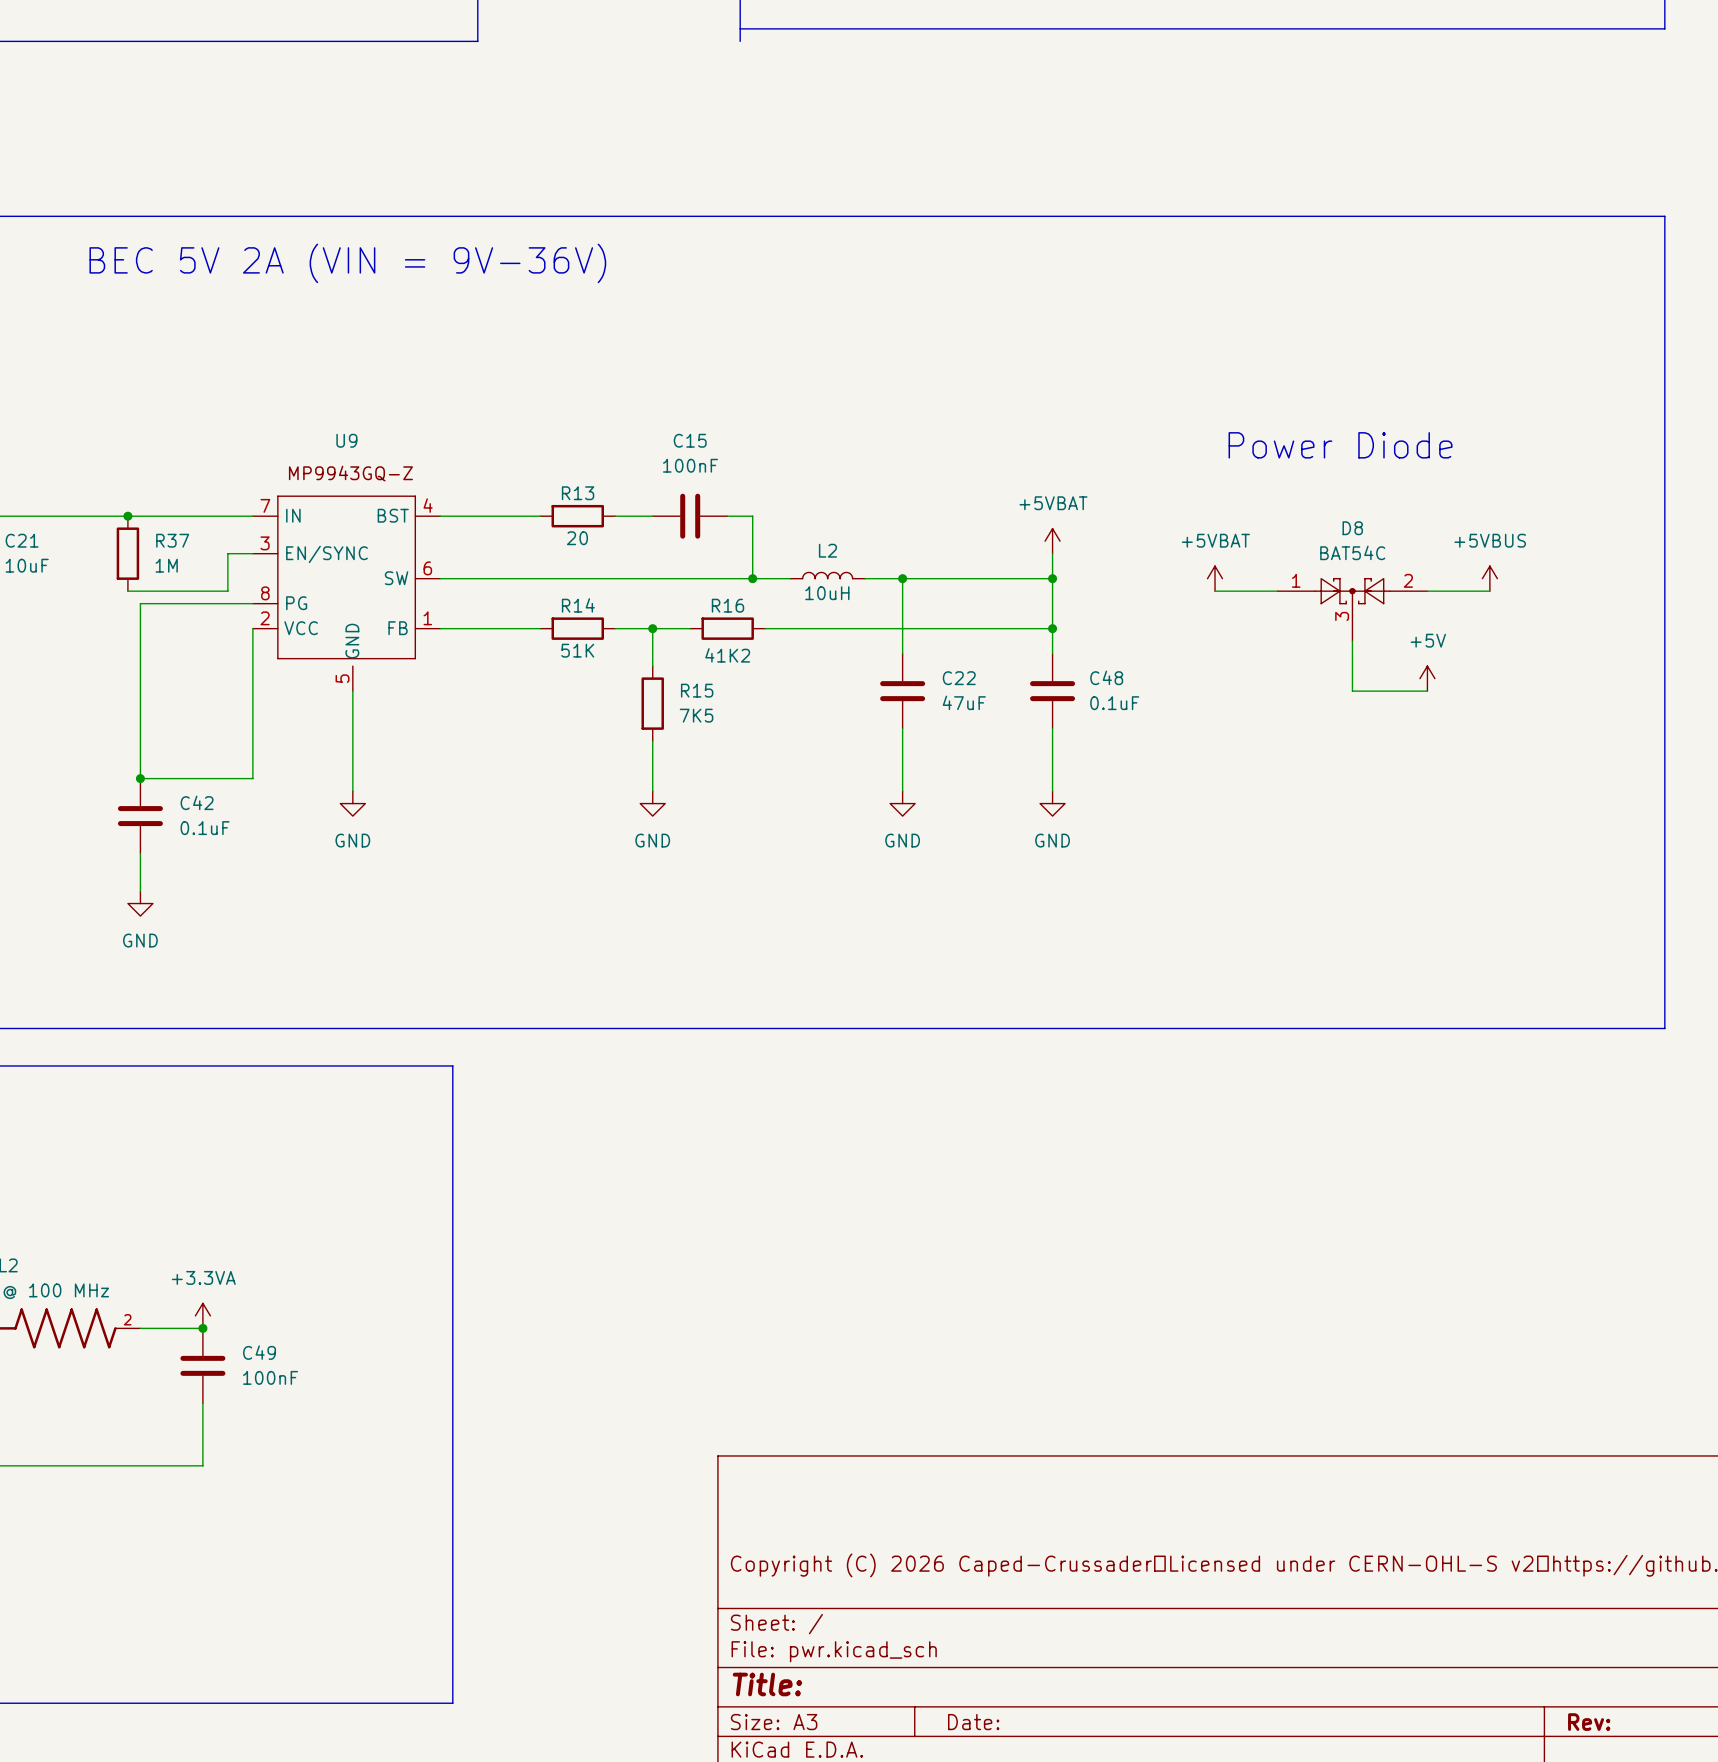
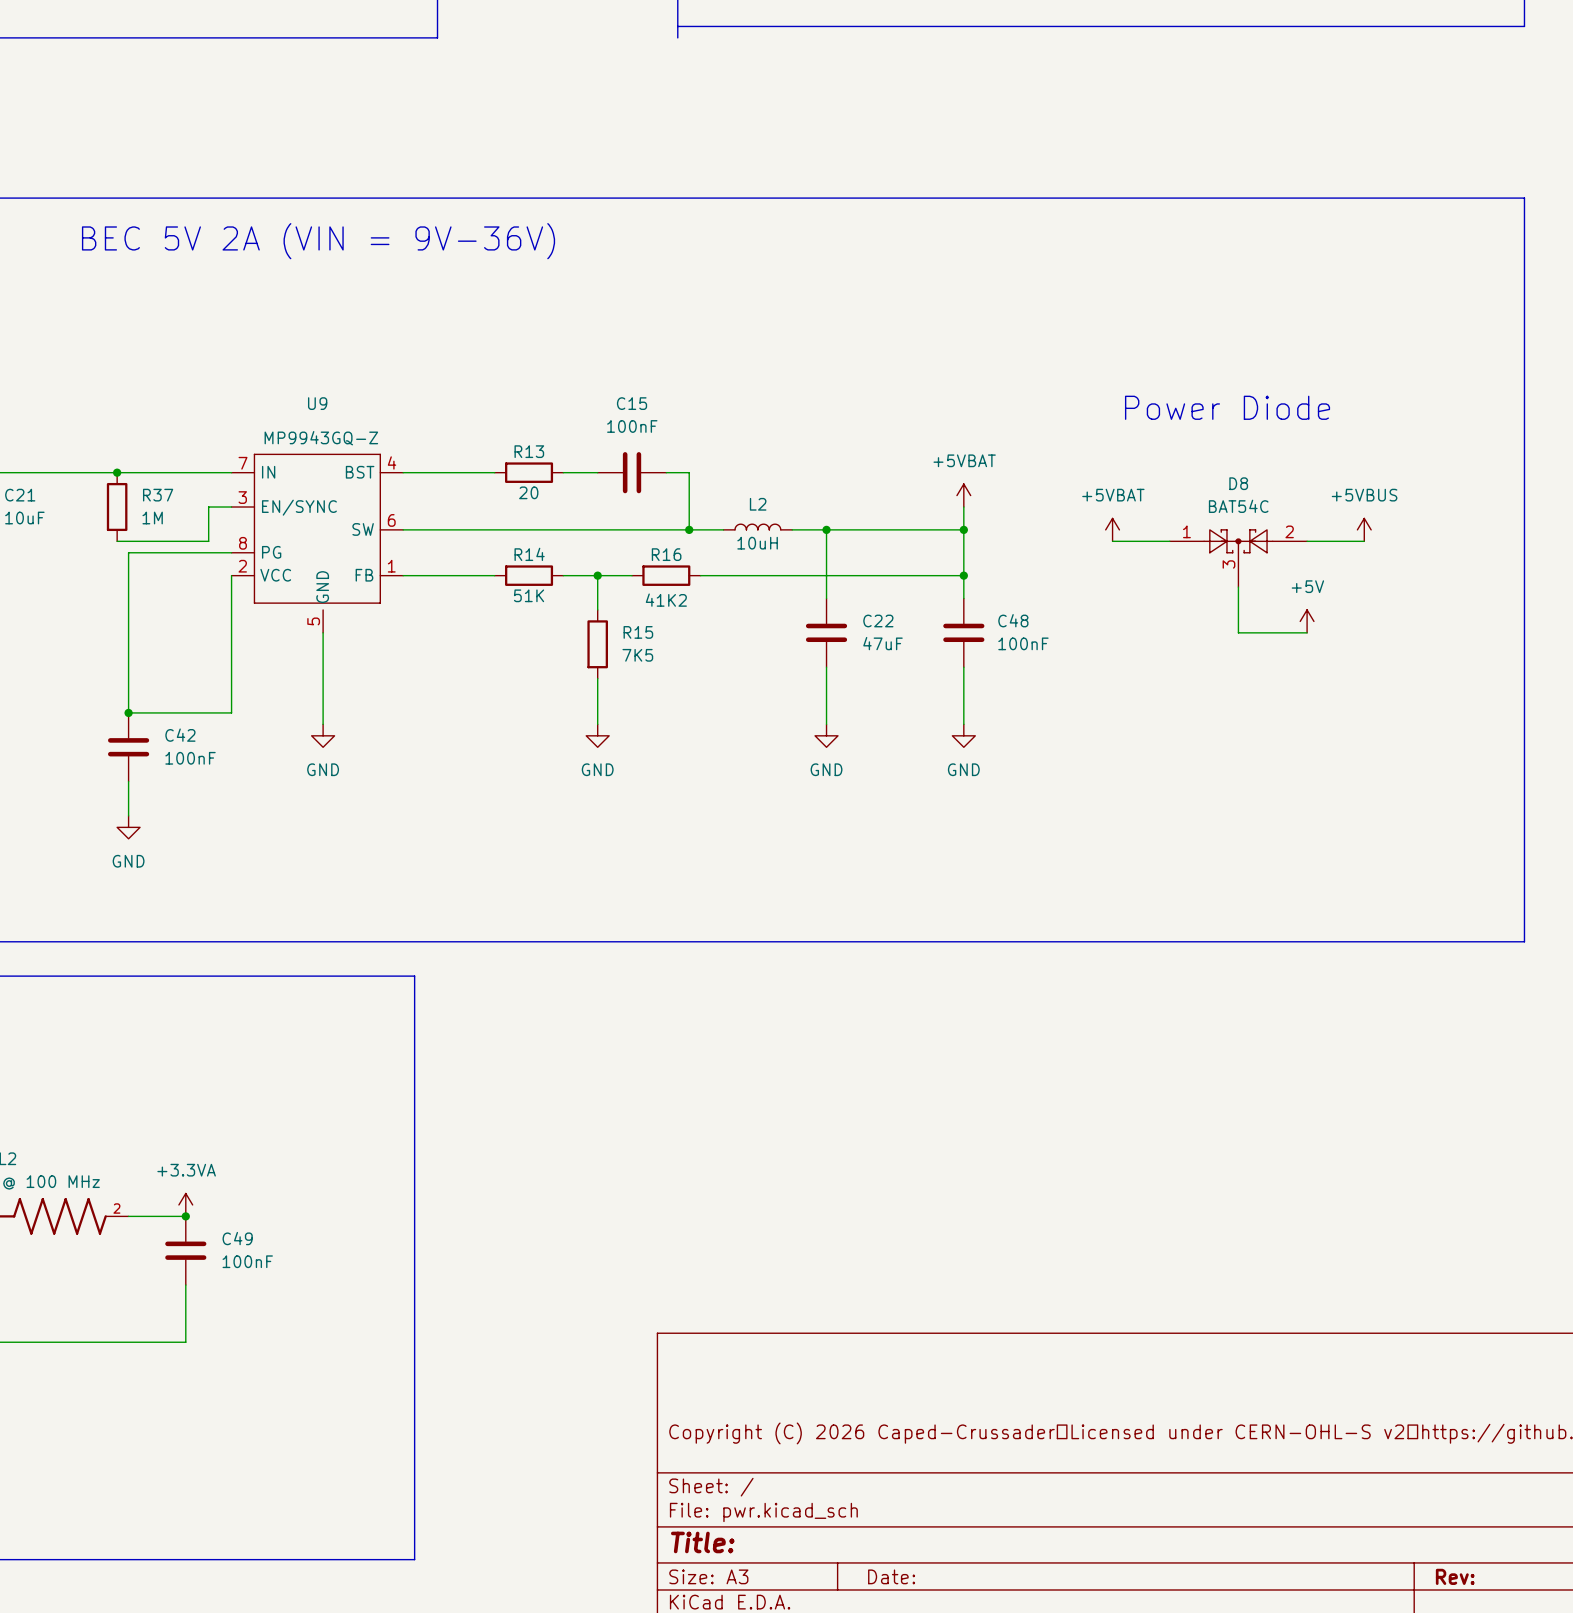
U9 text: MP9943GQ-Z (350, 473) -> none
U9 value: none -> MP9943GQ-Z (321, 438)
C48 value: 0.1uF (1114, 703) -> 100nF (1023, 643)
C42 value: 0.1uF (205, 828) -> 100nF (190, 758)

